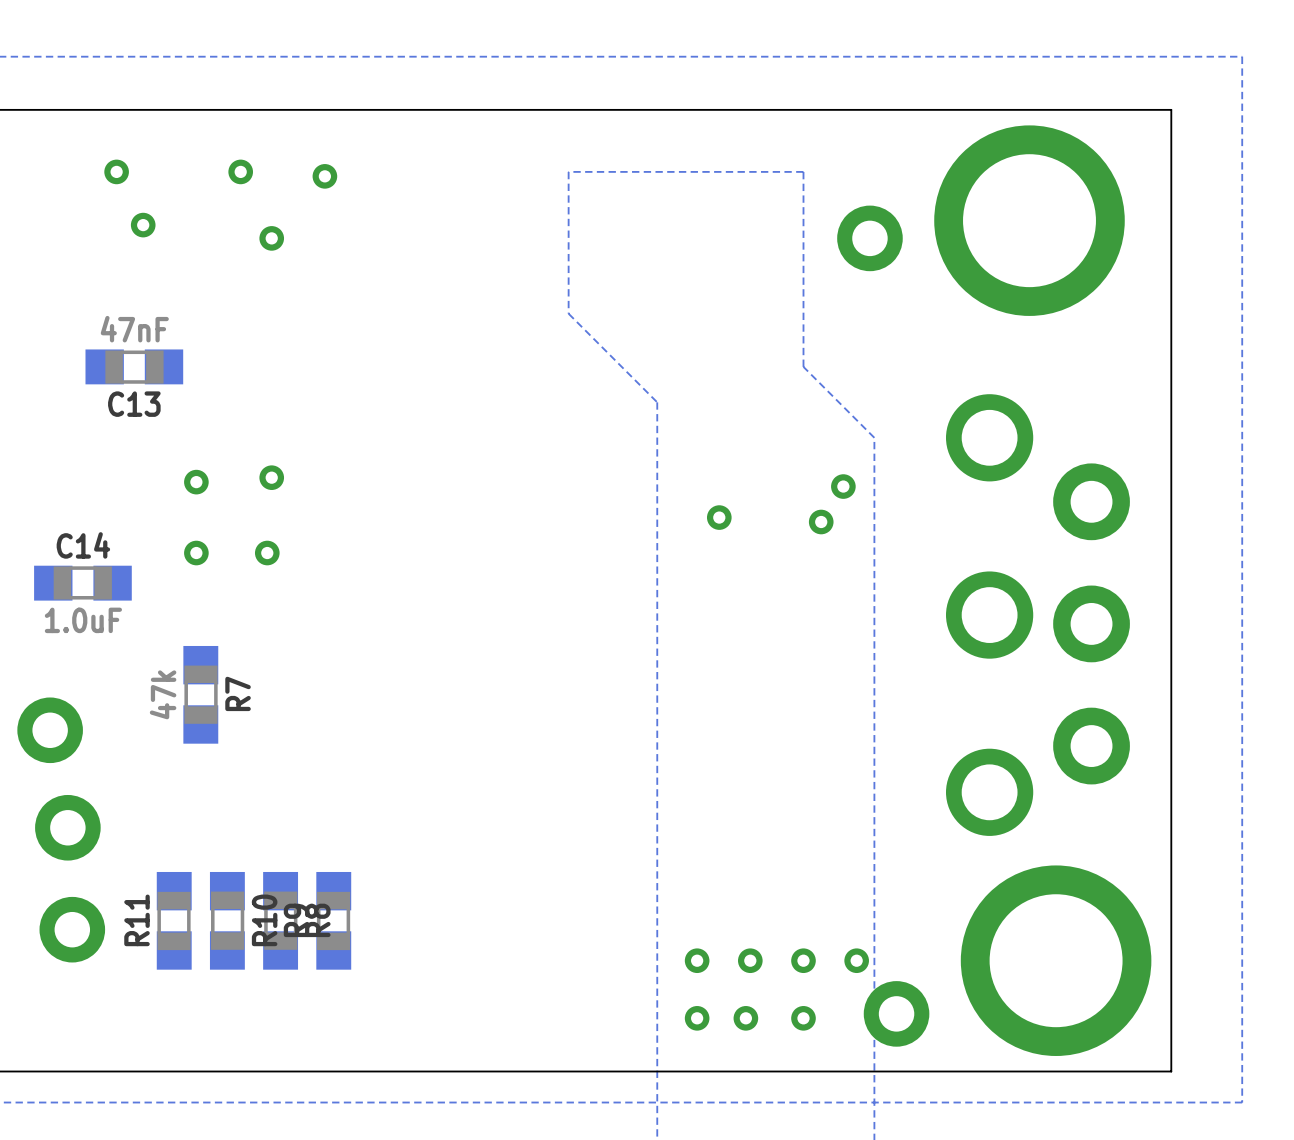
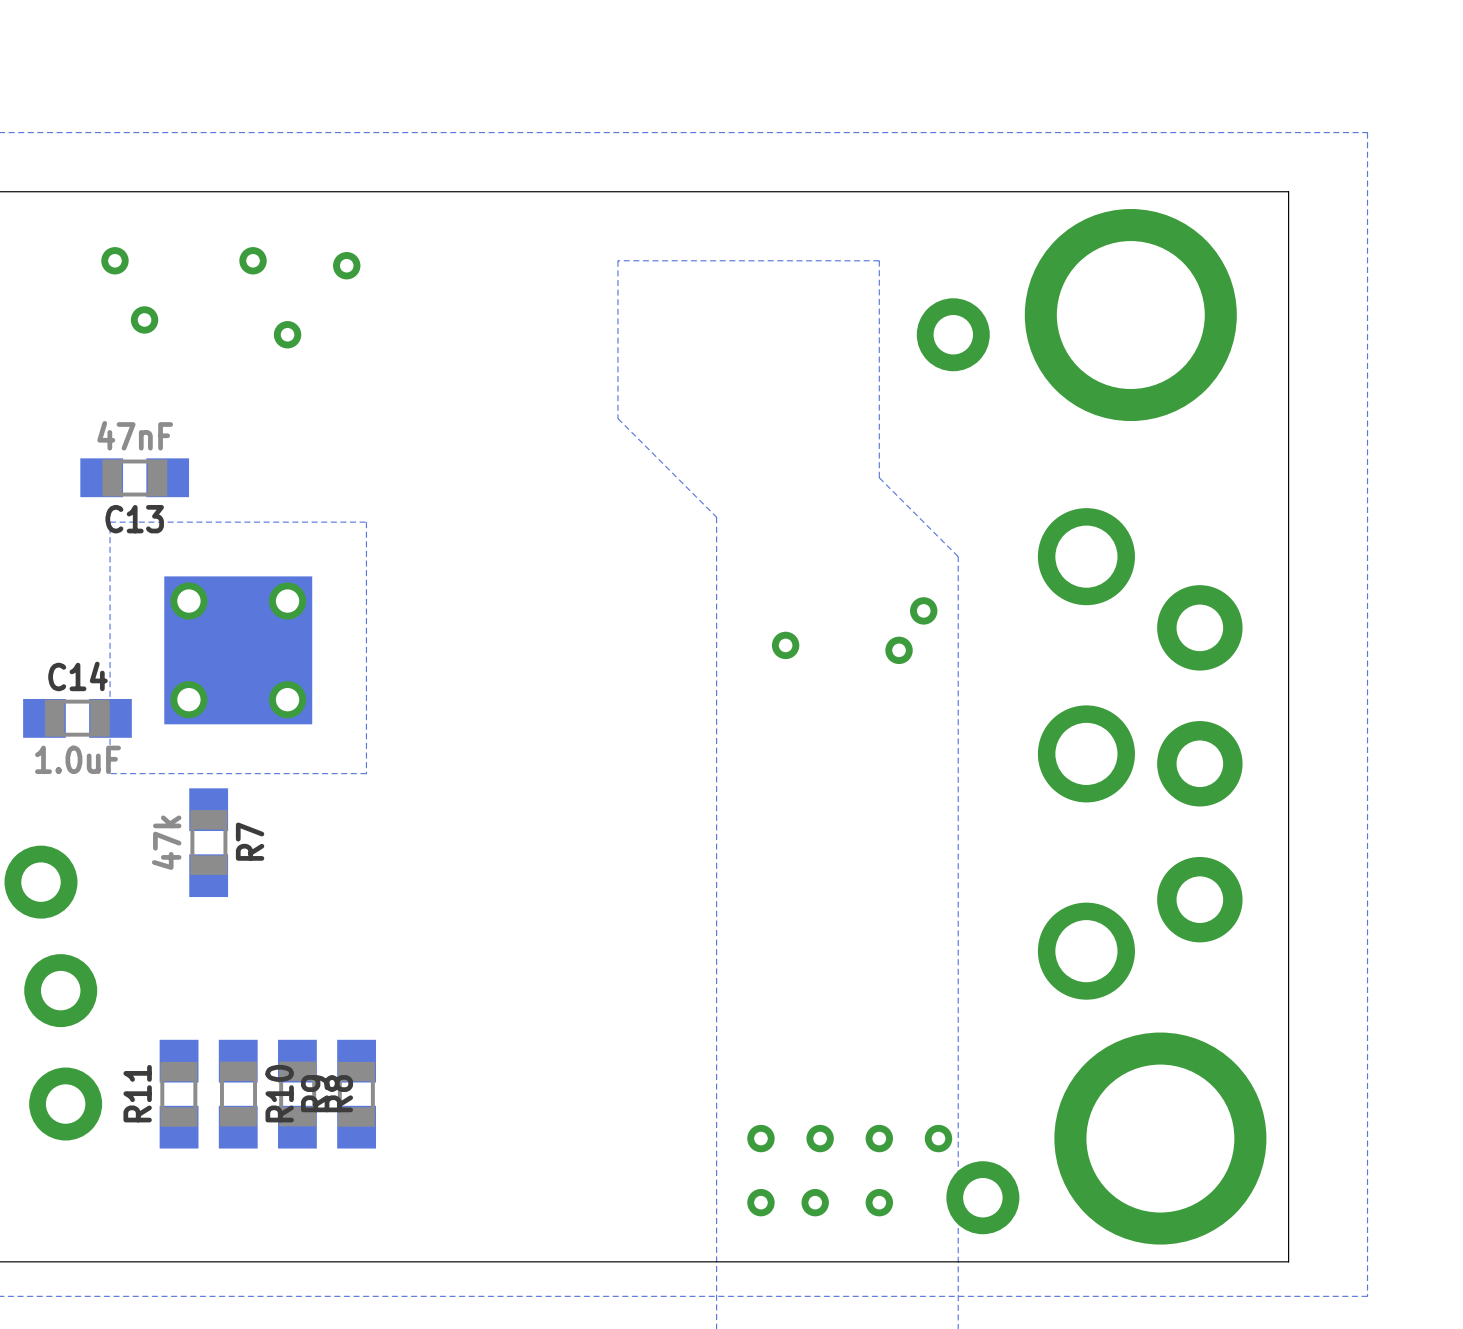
zone outline: none -> (366, 522) (366, 773) (110, 773) (110, 522) (366, 522)
via: (271, 477) -> none
via: (196, 482) -> none
part: none -> (238, 650)
via: (196, 553) -> none
via: (267, 553) -> none

